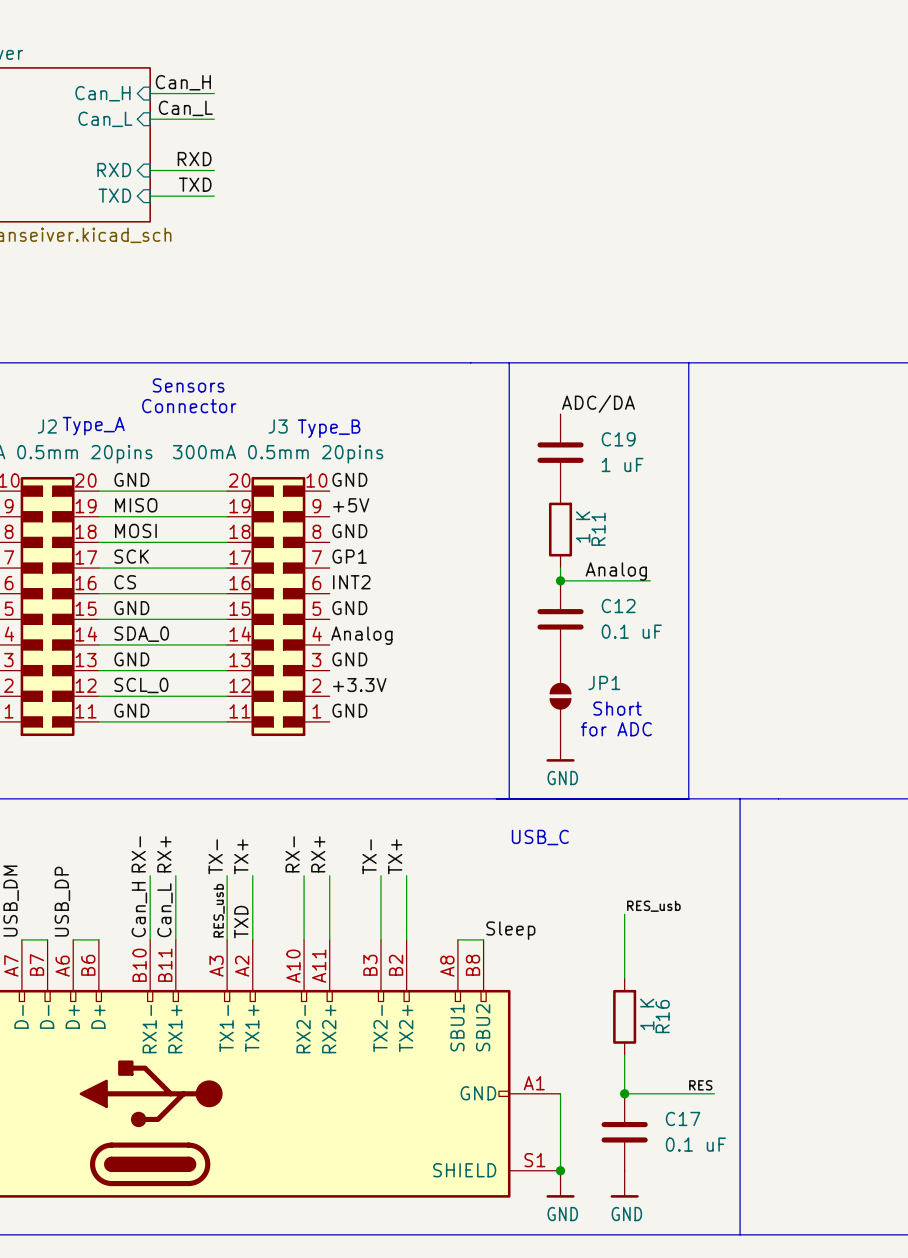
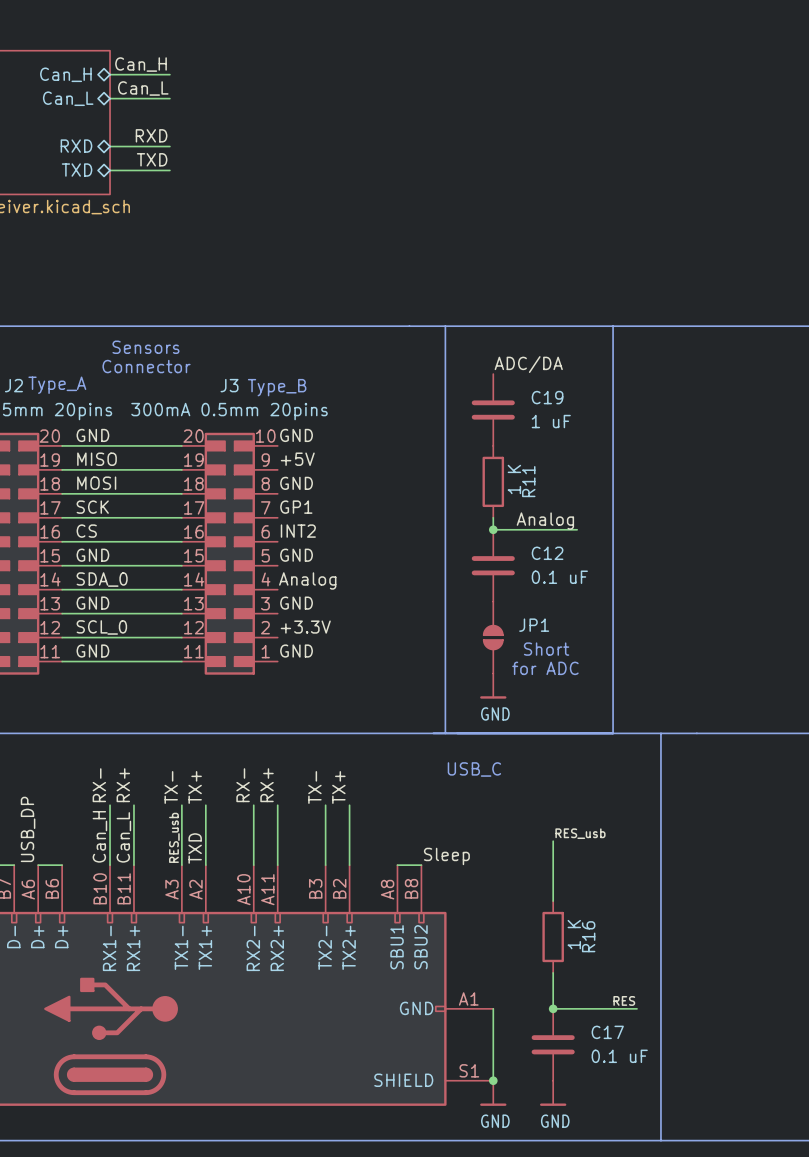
sheet pin shape: input (102, 93) -> bidirectional (65, 74)
sheet pin shape: input (105, 119) -> bidirectional (68, 98)
sheet pin shape: input (114, 170) -> bidirectional (76, 146)
sheet pin shape: input (114, 195) -> bidirectional (77, 170)

